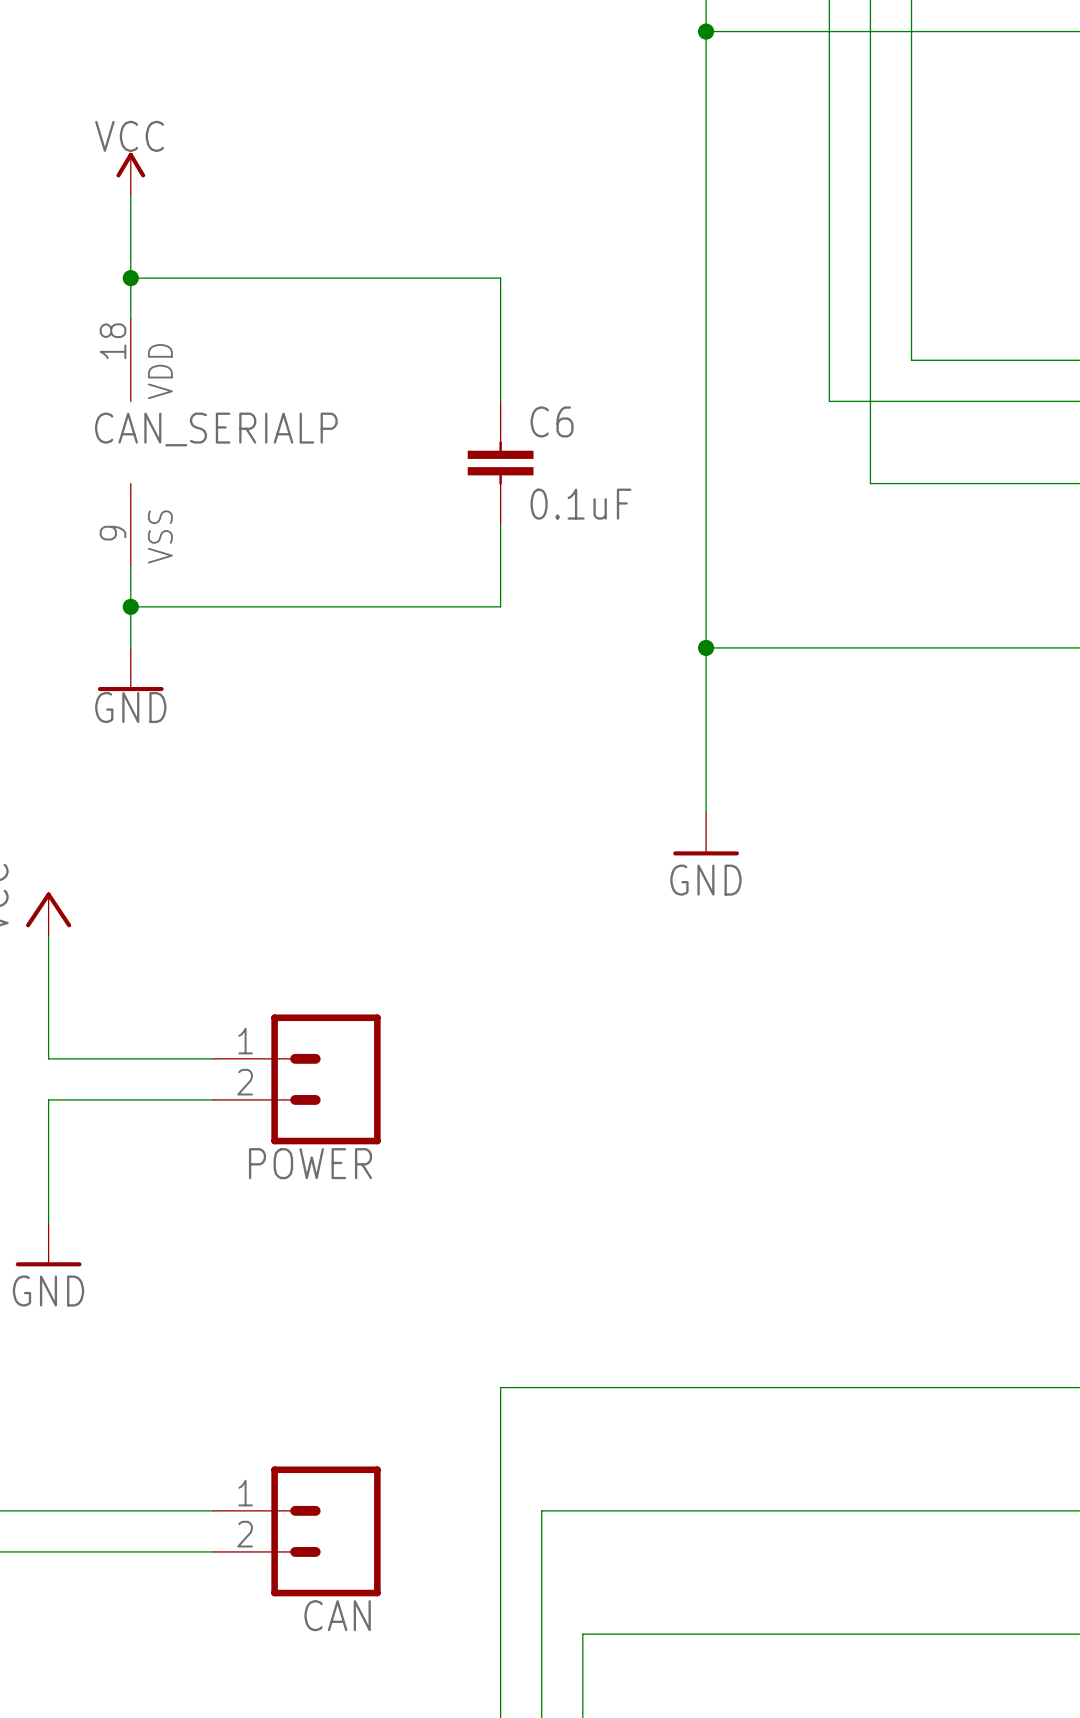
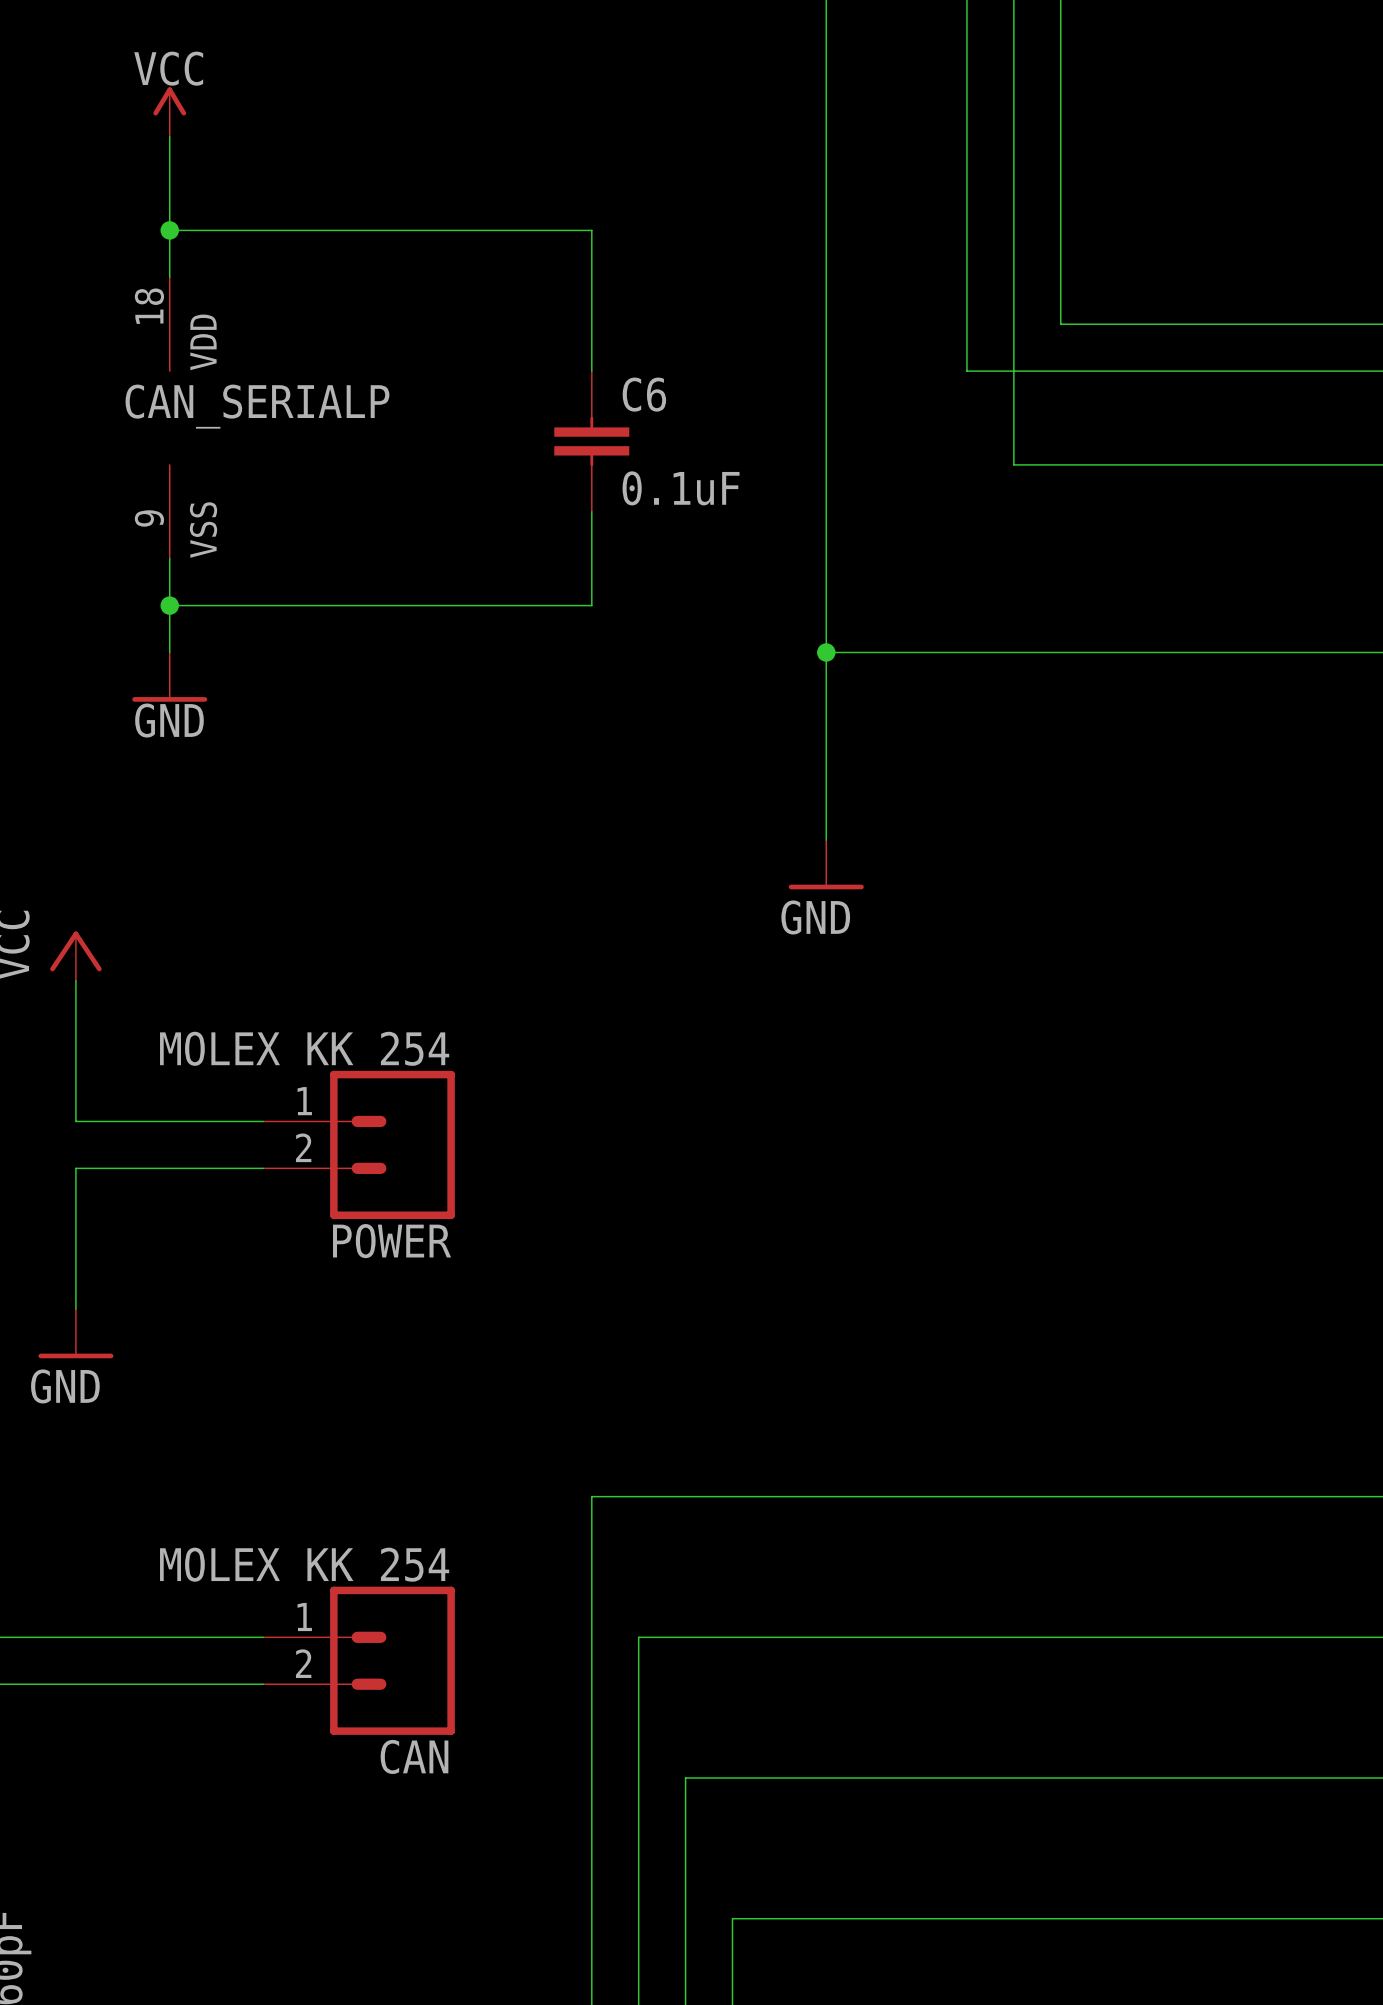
POWER value: none -> MOLEX KK 254 (304, 1048)
CAN value: none -> MOLEX KK 254 (304, 1564)

